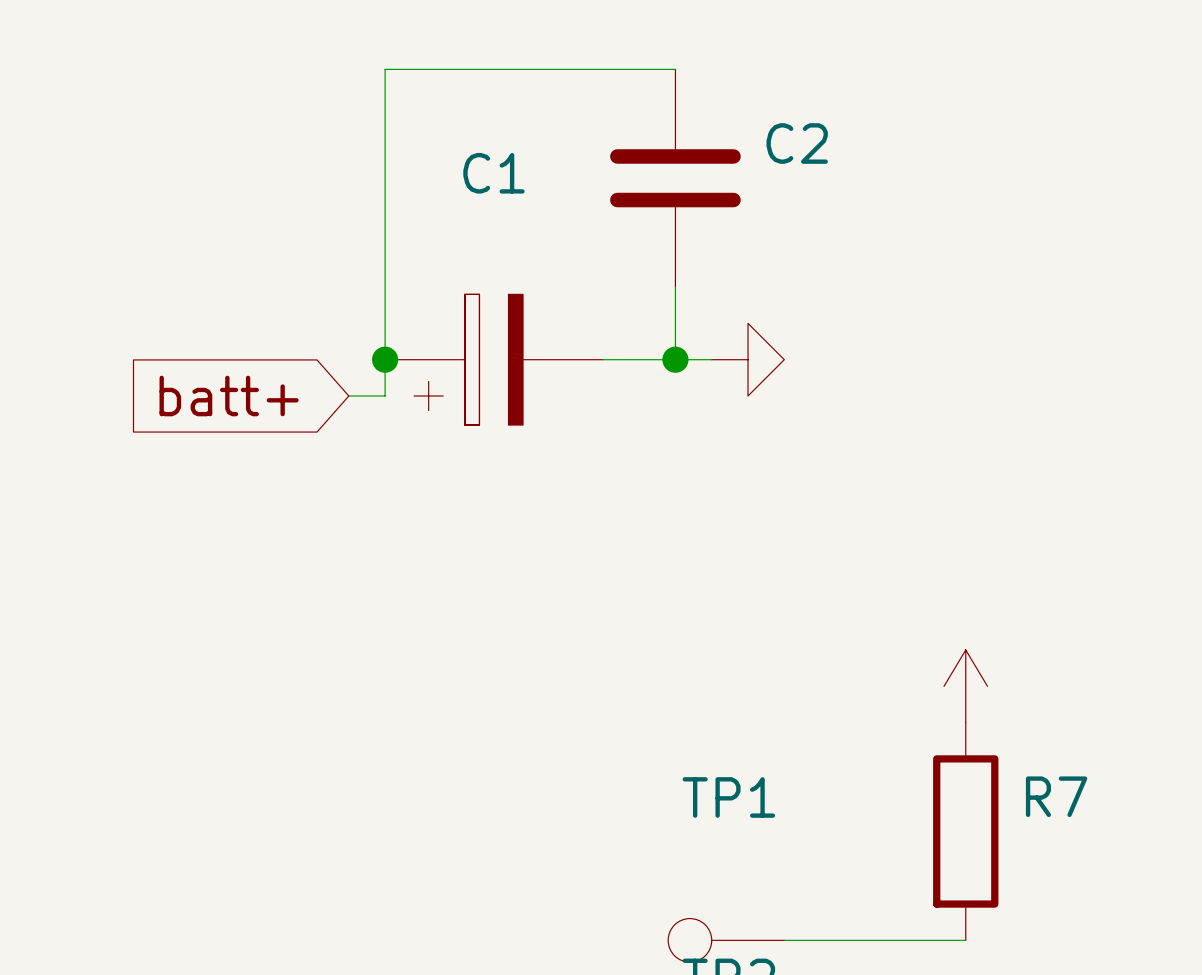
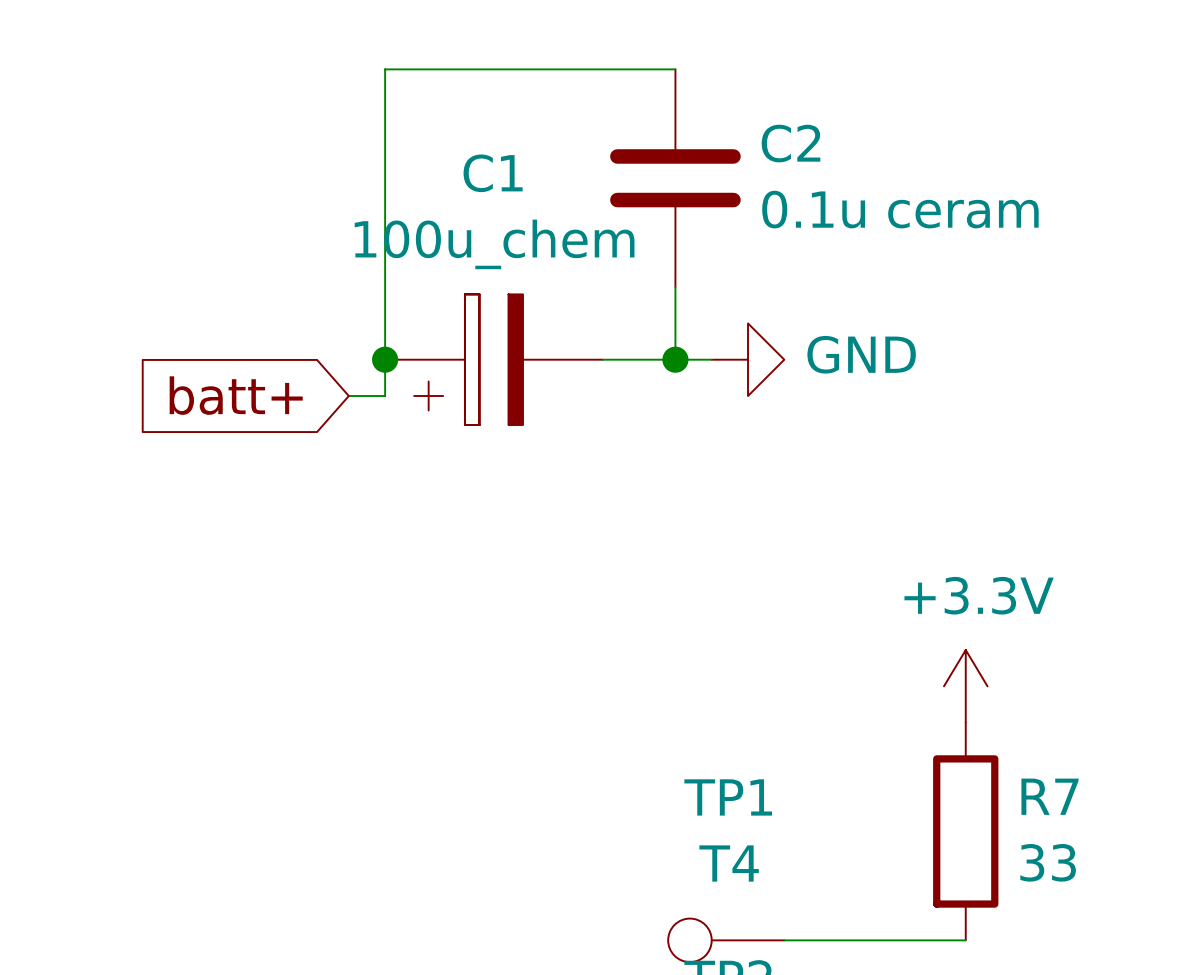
C2 value: none -> 0.1u ceram (900, 209)
C1 value: none -> 100u_chem (494, 244)
power symbol text: none -> GND (861, 354)
power symbol text: none -> +3.3V (979, 595)
TP1 value: none -> T4 (729, 863)
R7 value: none -> 33 (1048, 862)

